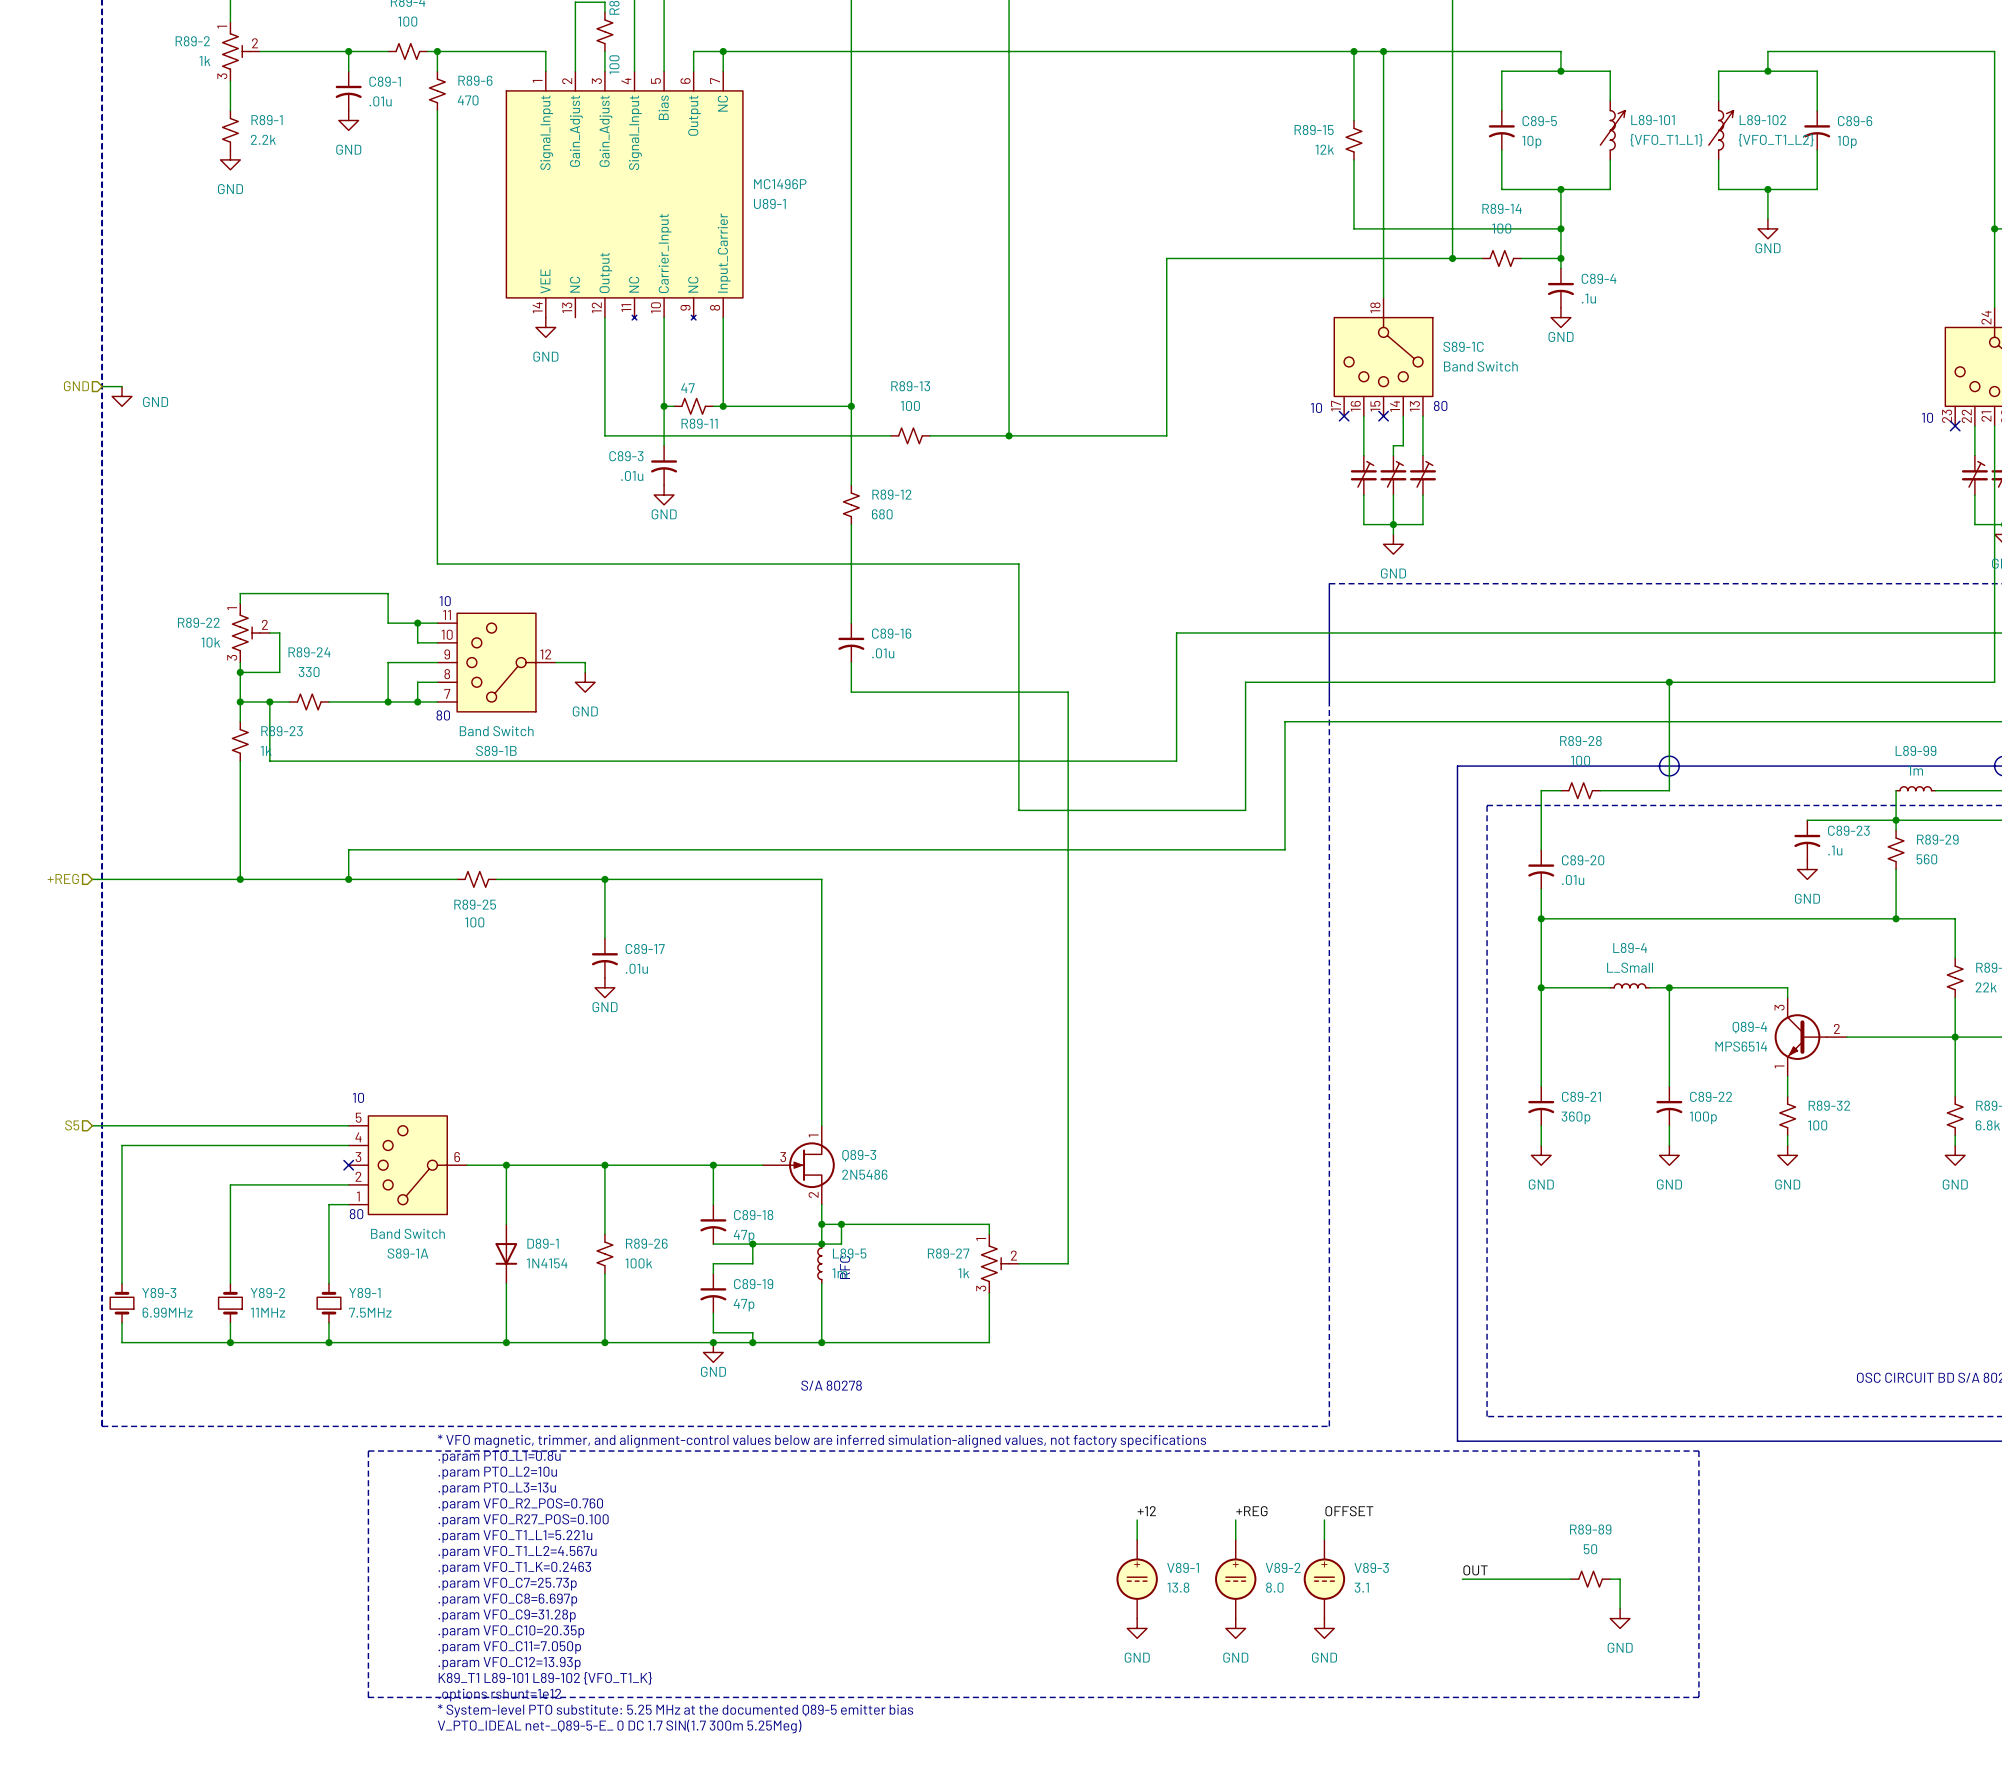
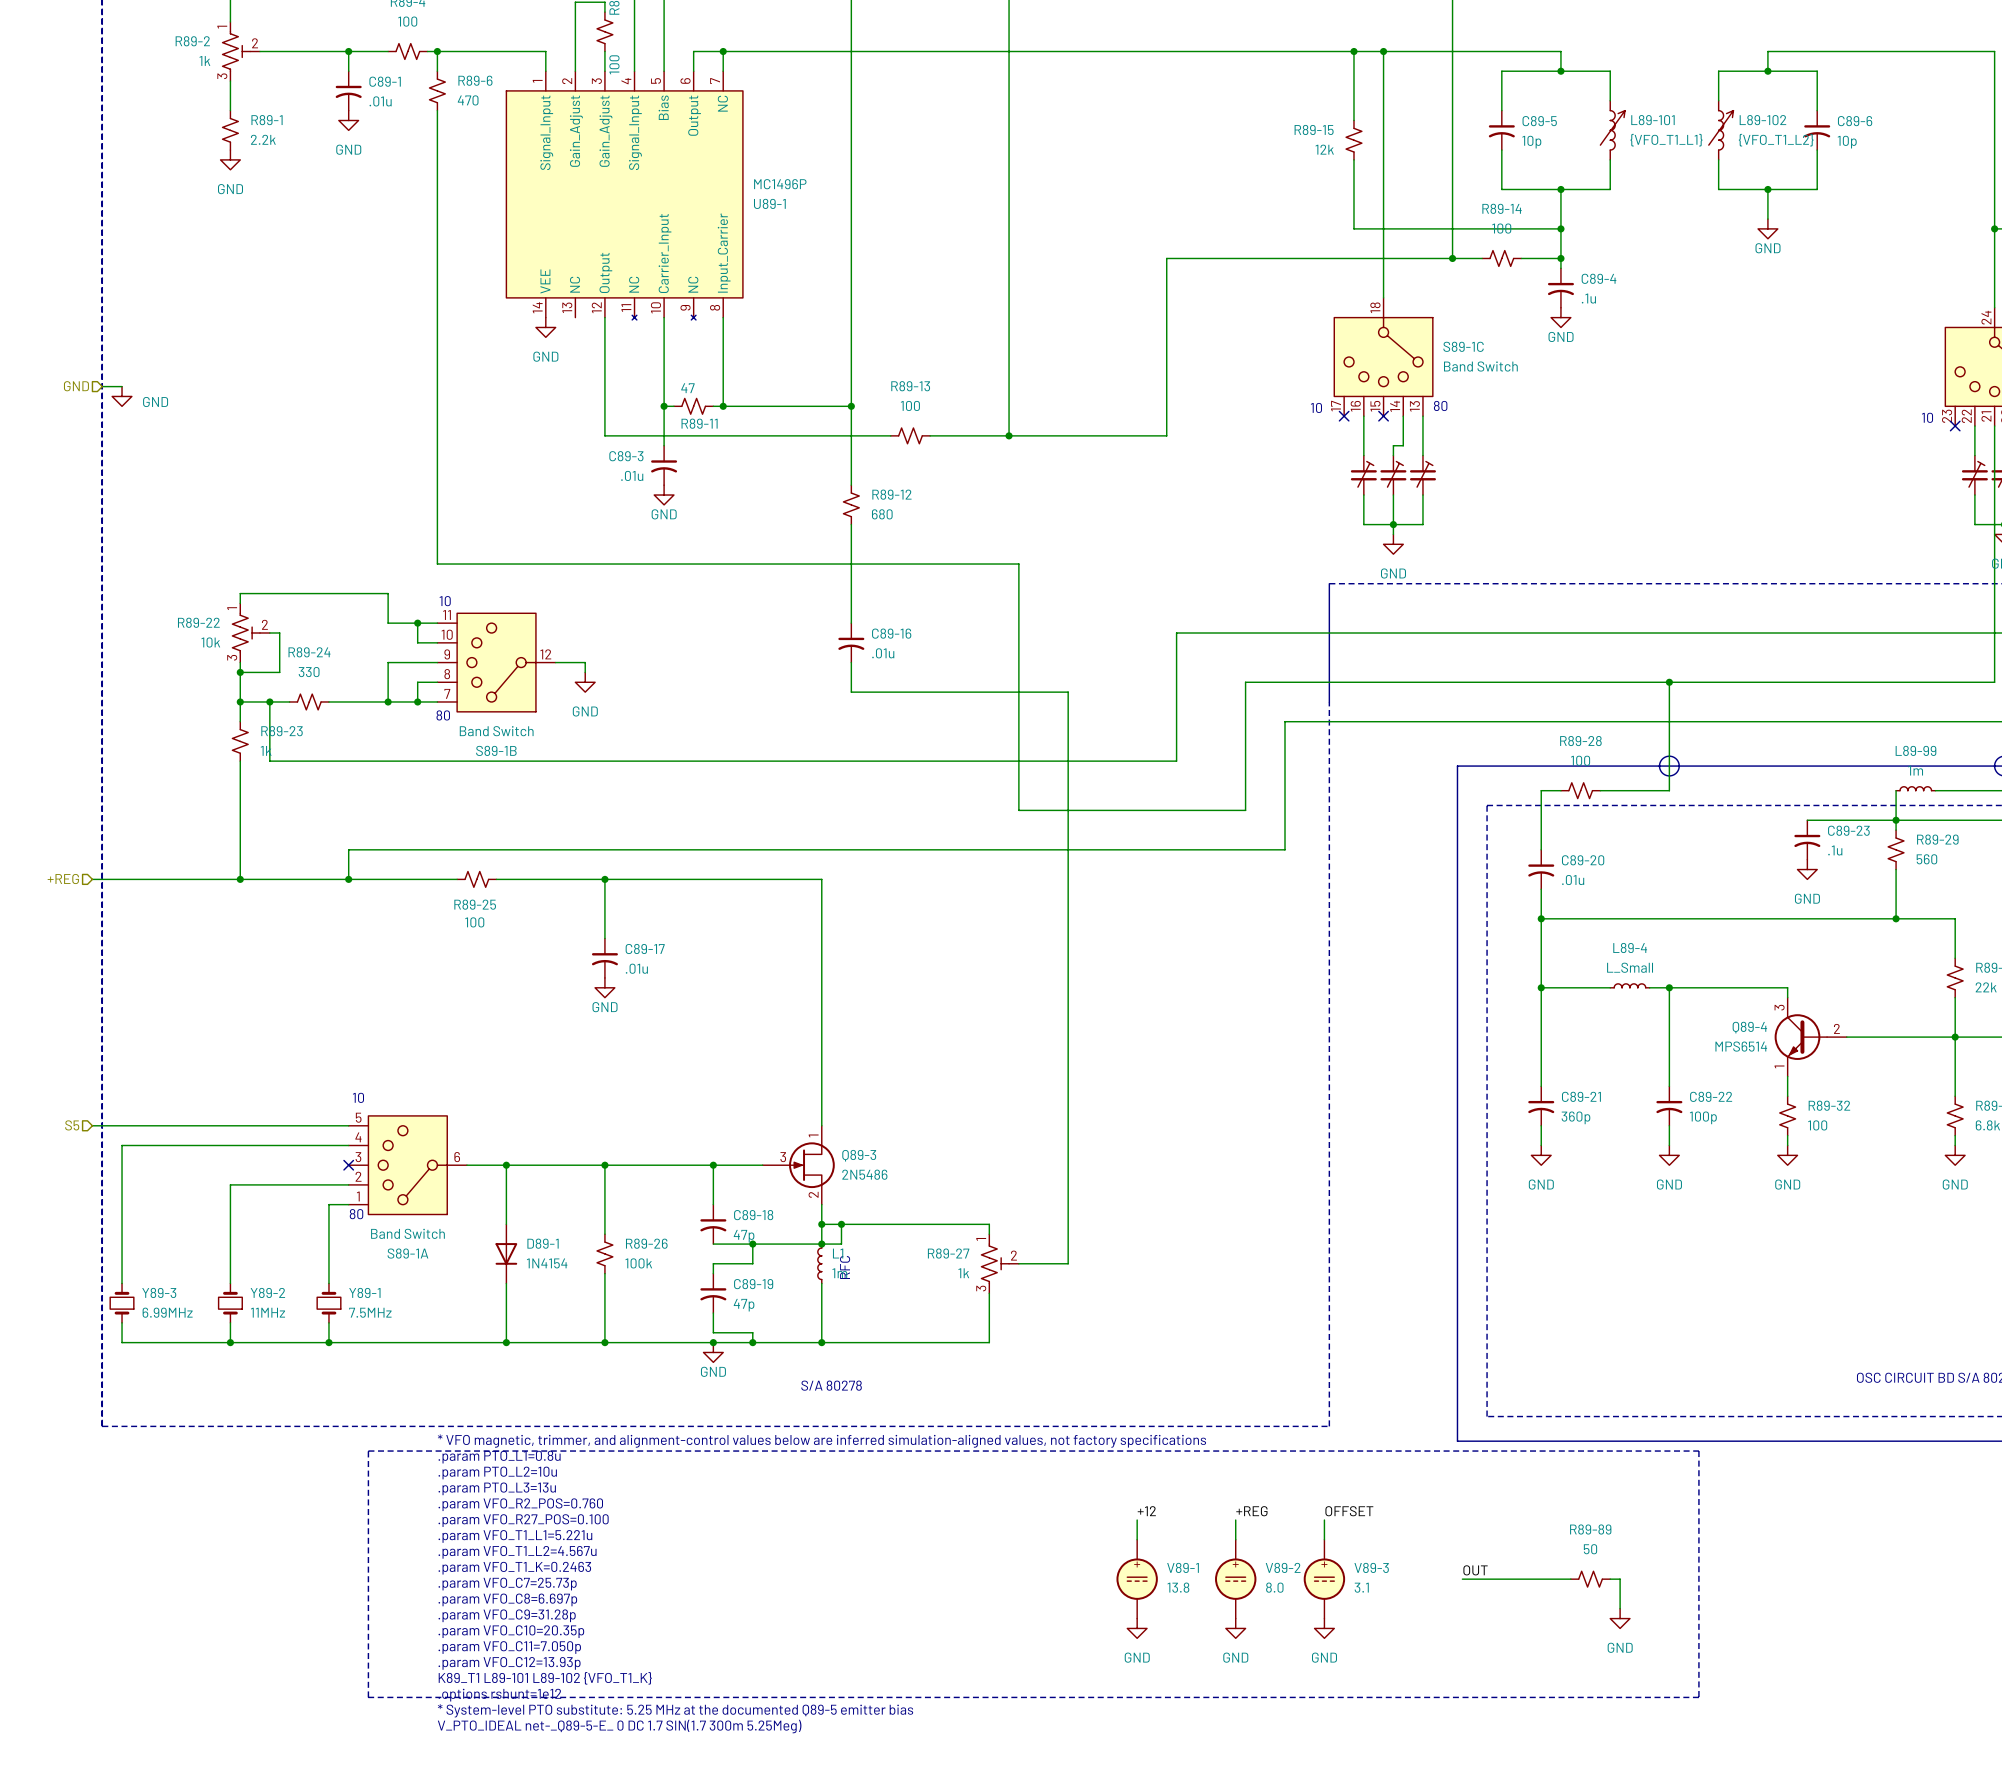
L89-5 name: L89-5 (849, 1253) -> L1 (838, 1253)

